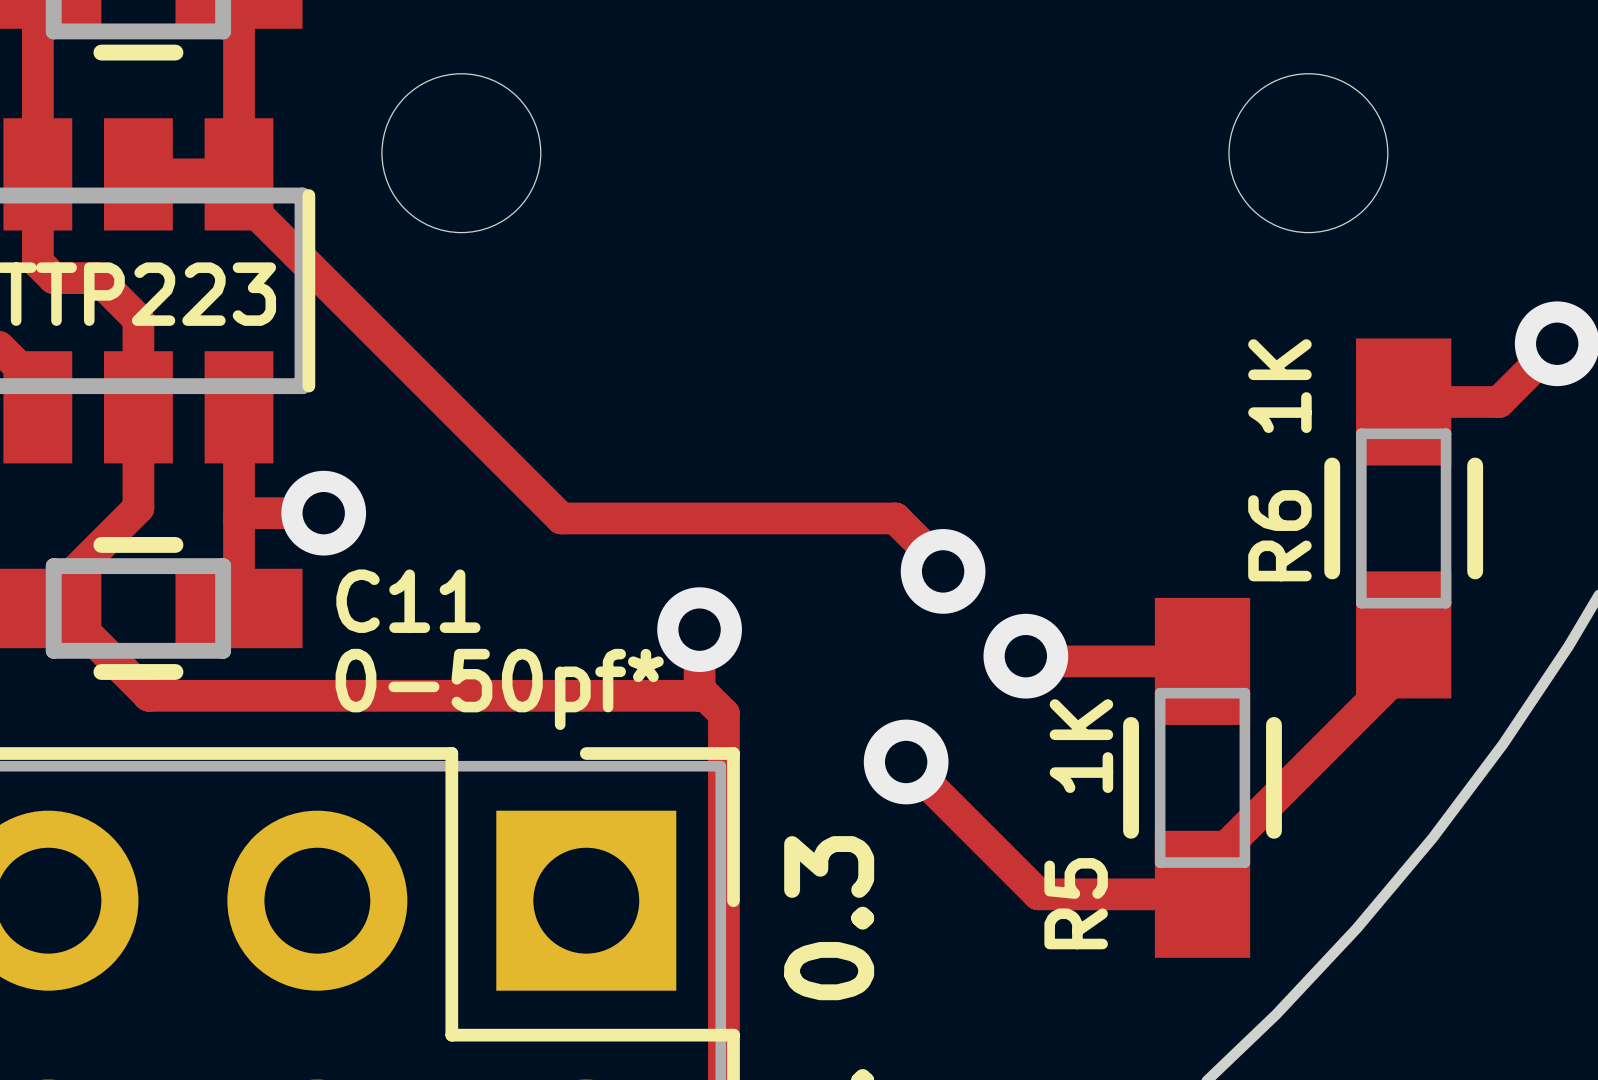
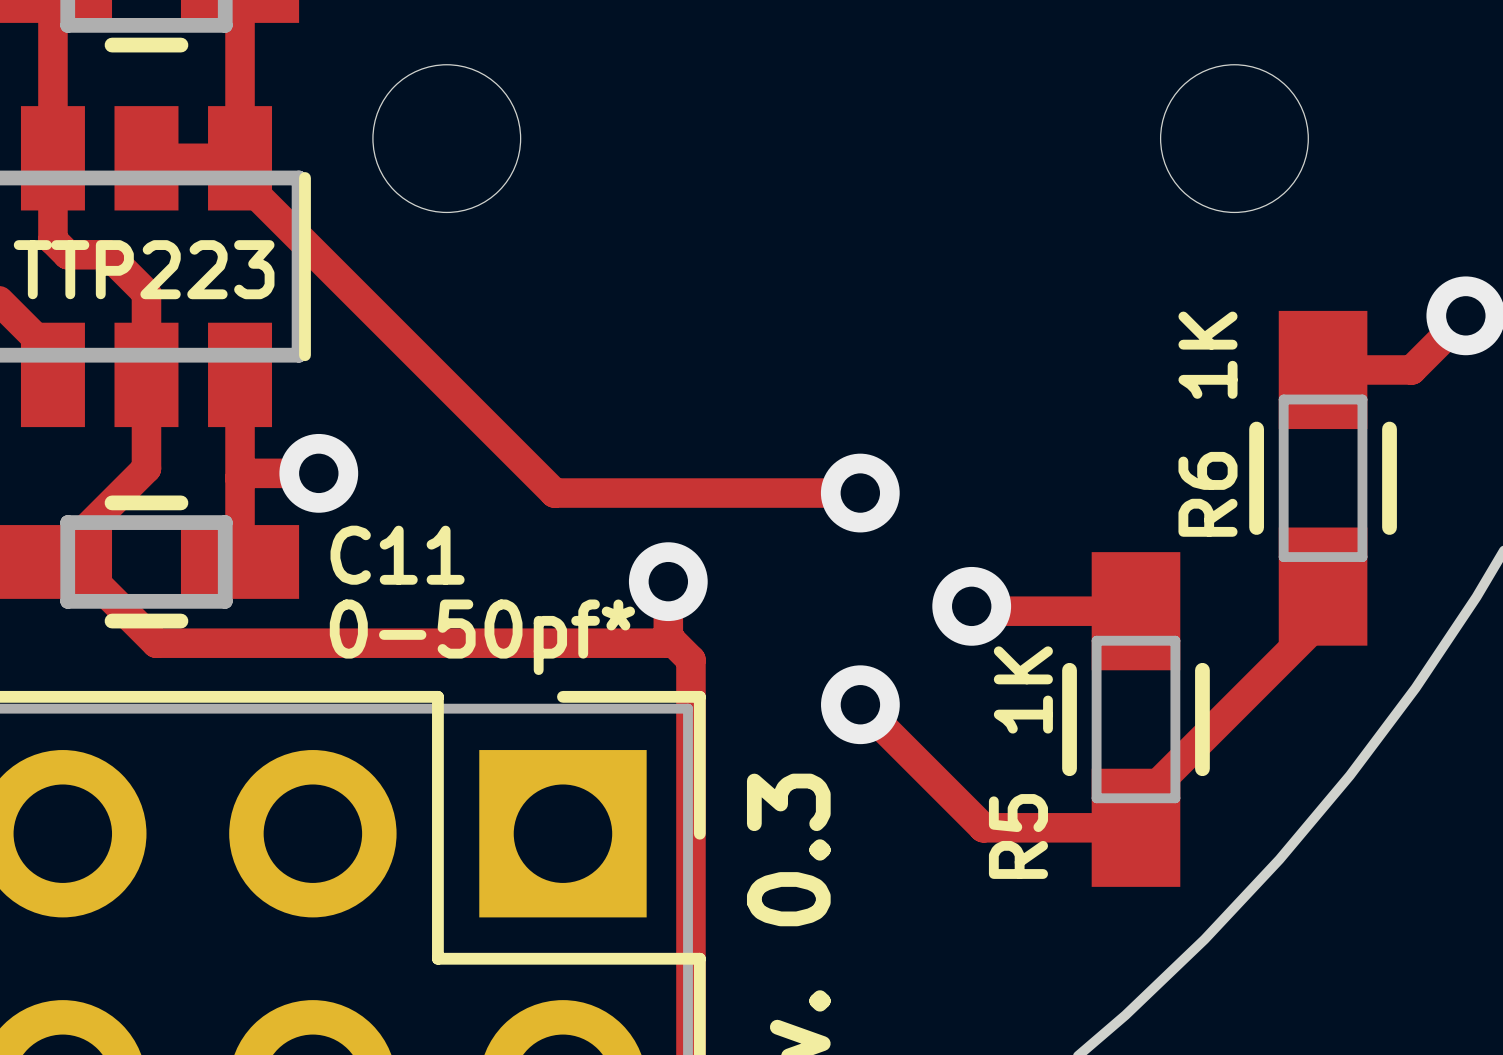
track: (561, 518) (895, 518) (927, 550) (927, 555) (943, 571) -> (539, 478) (554, 493) (860, 493)
via position: (943, 571) -> (860, 493)

